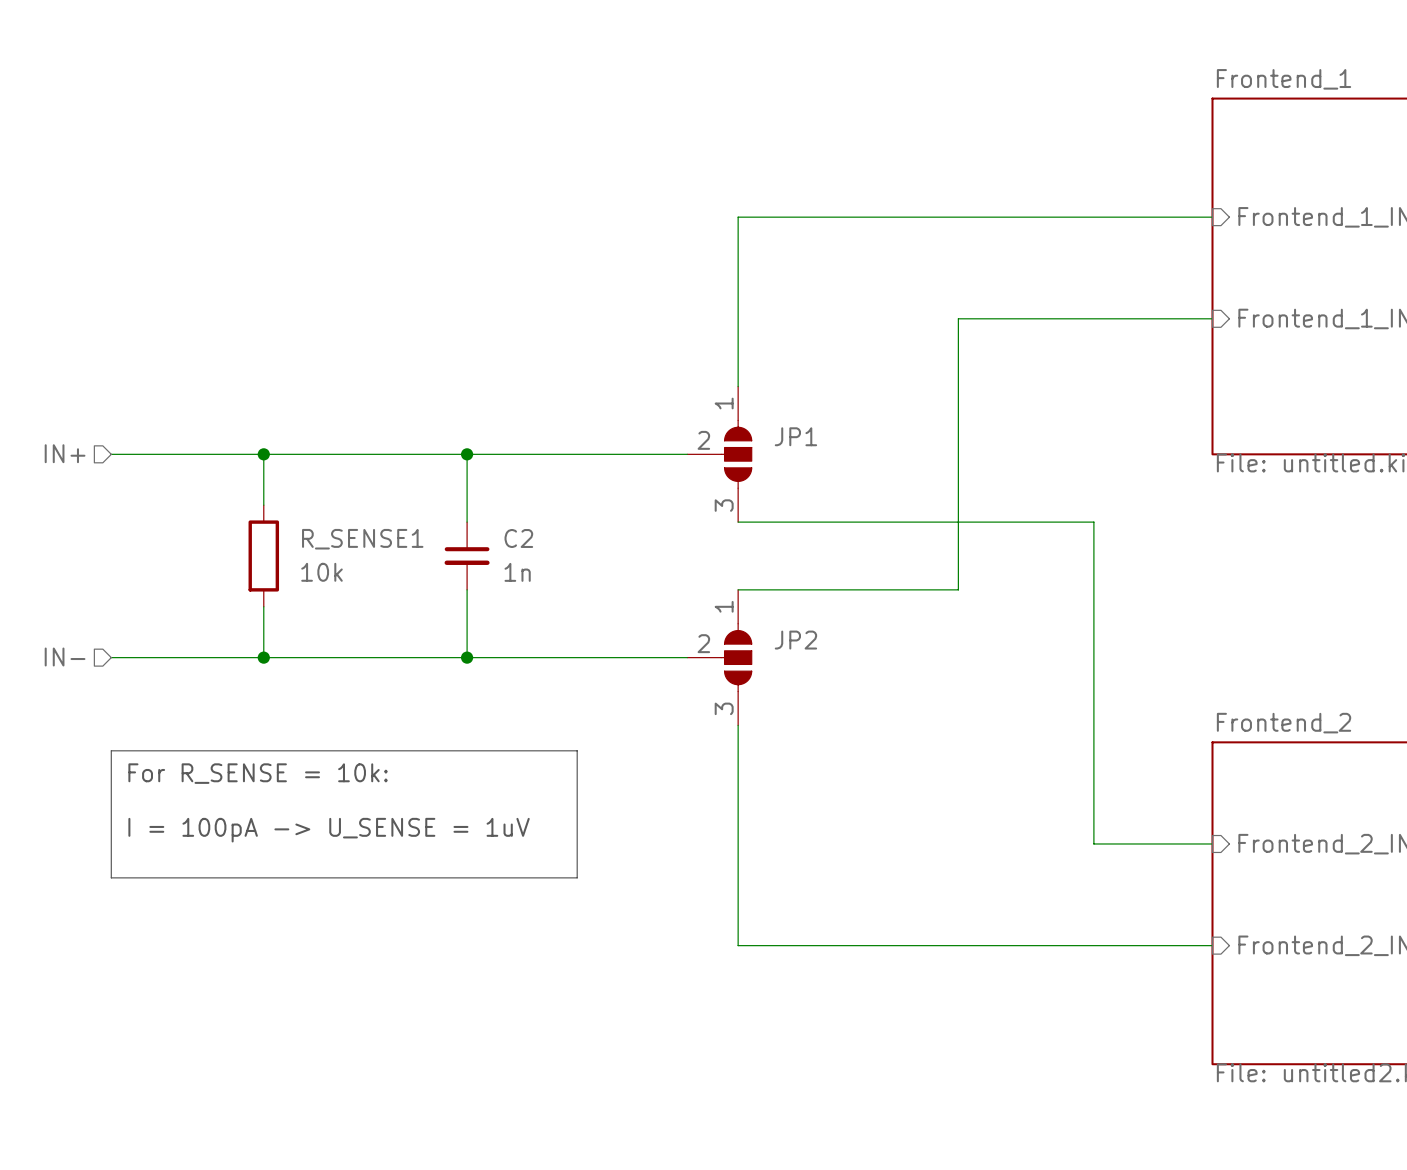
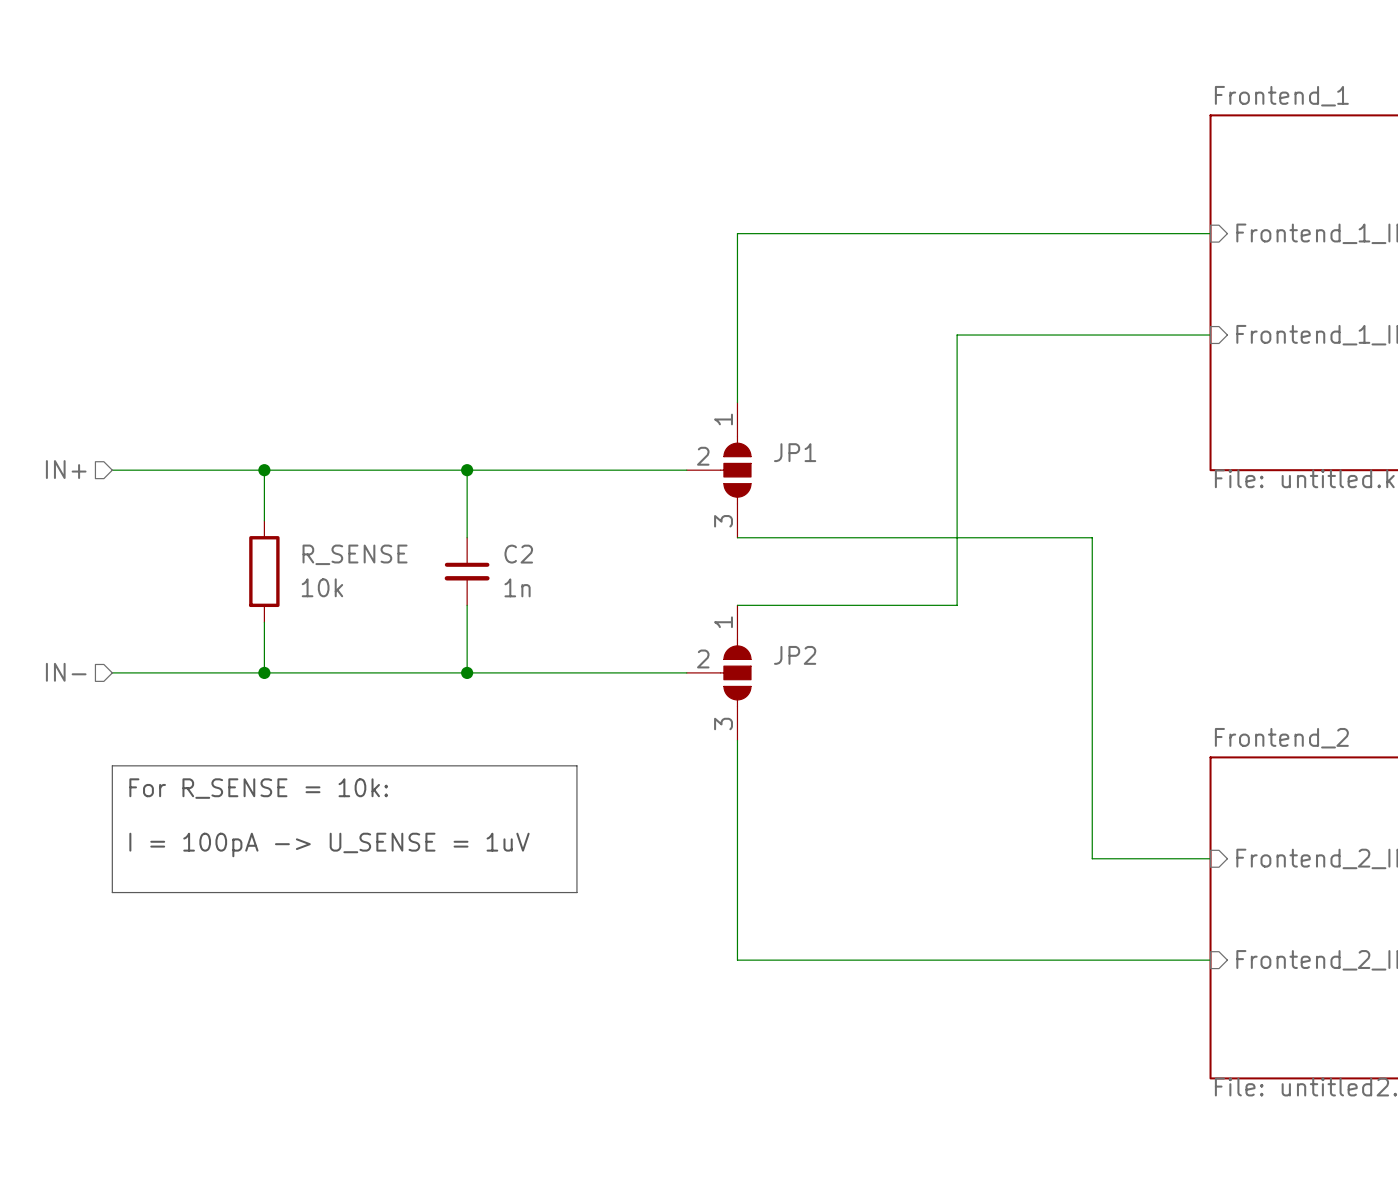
R_SENSE1 name: R_SENSE1 (362, 539) -> R_SENSE (355, 554)

